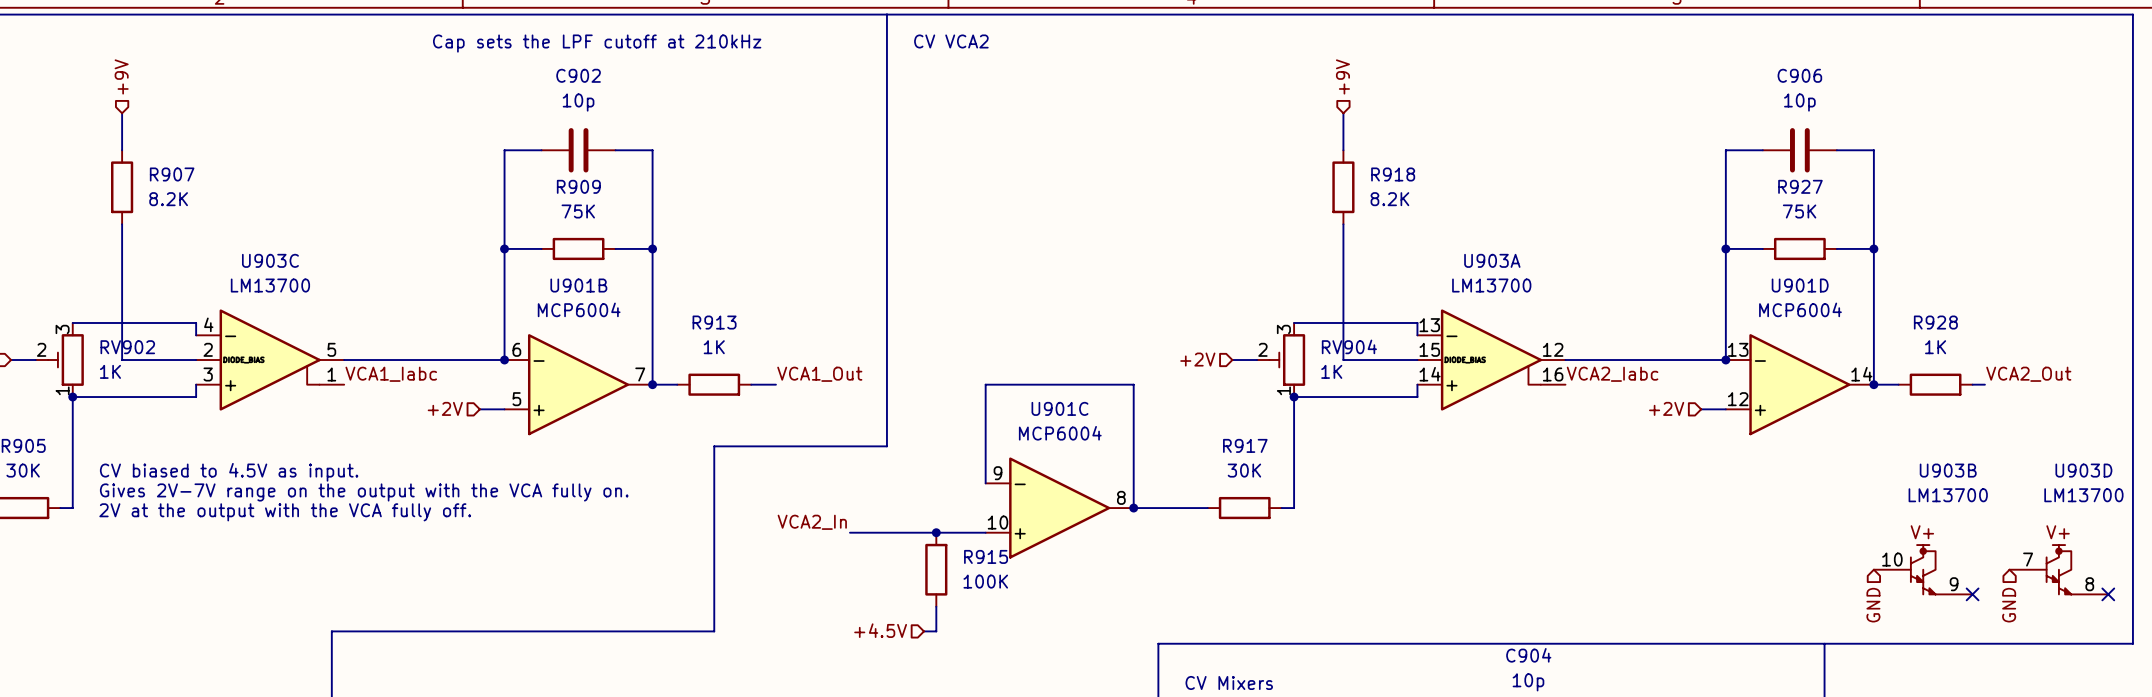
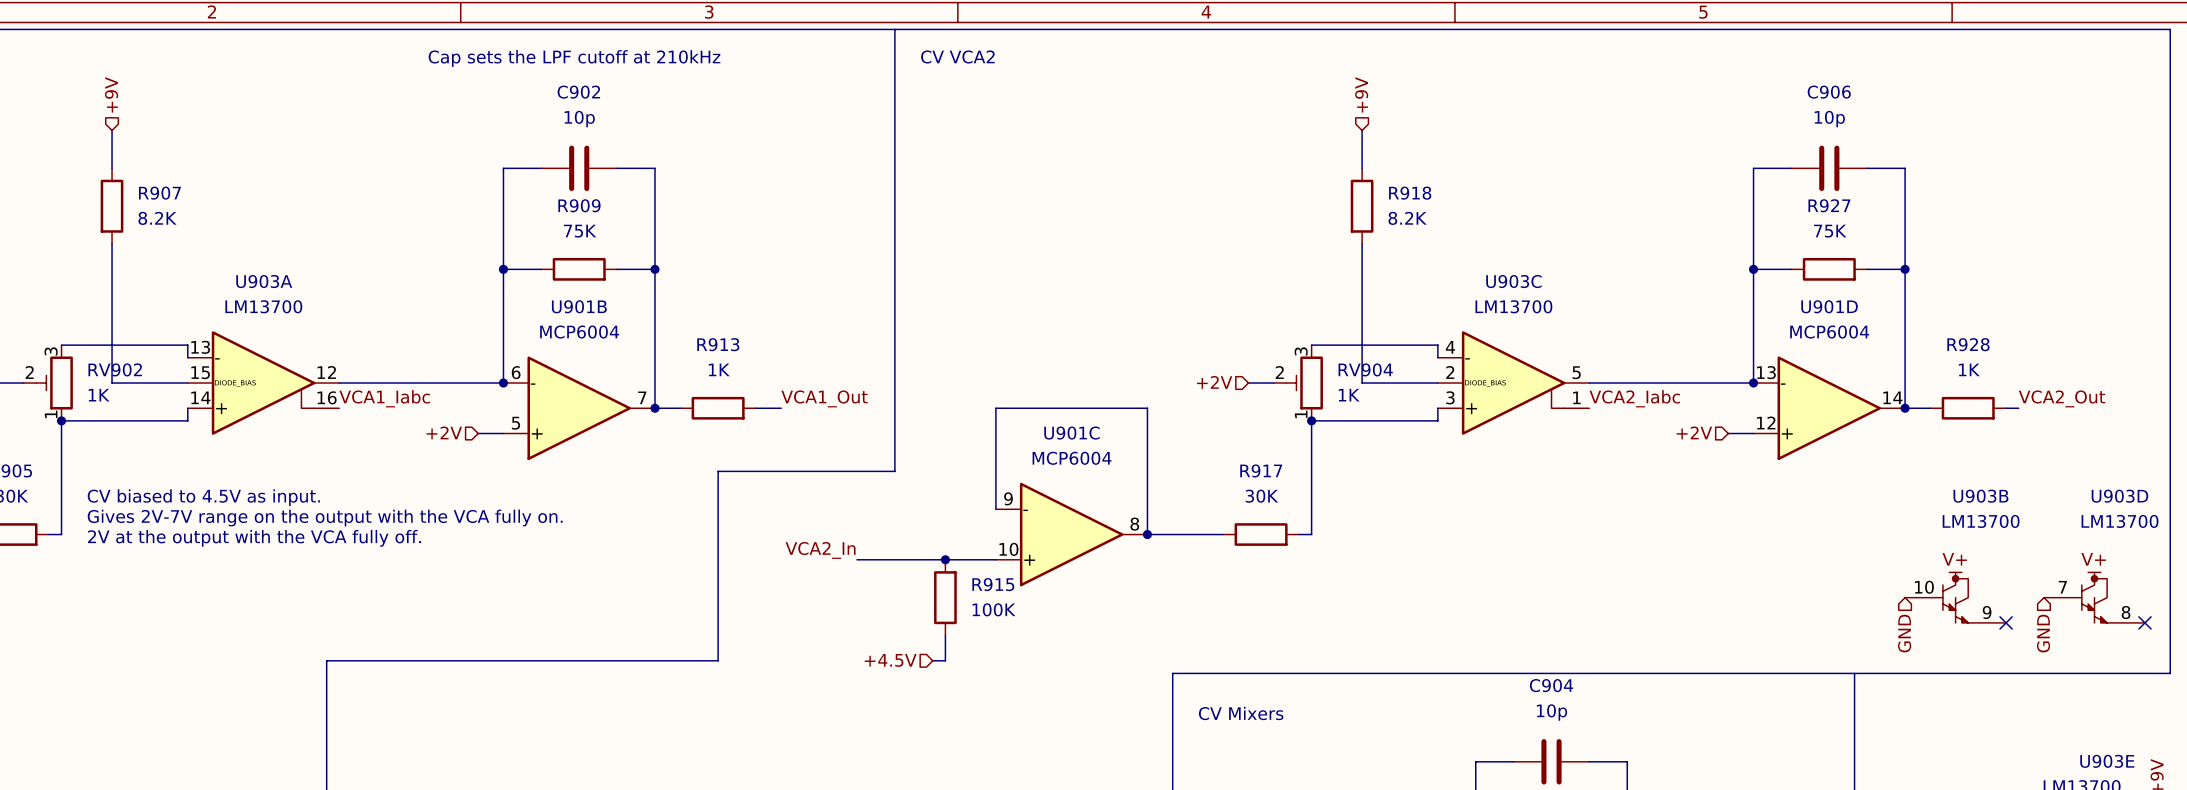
U903C position: (270, 360) -> (1513, 383)
U903A position: (1491, 360) -> (263, 383)

